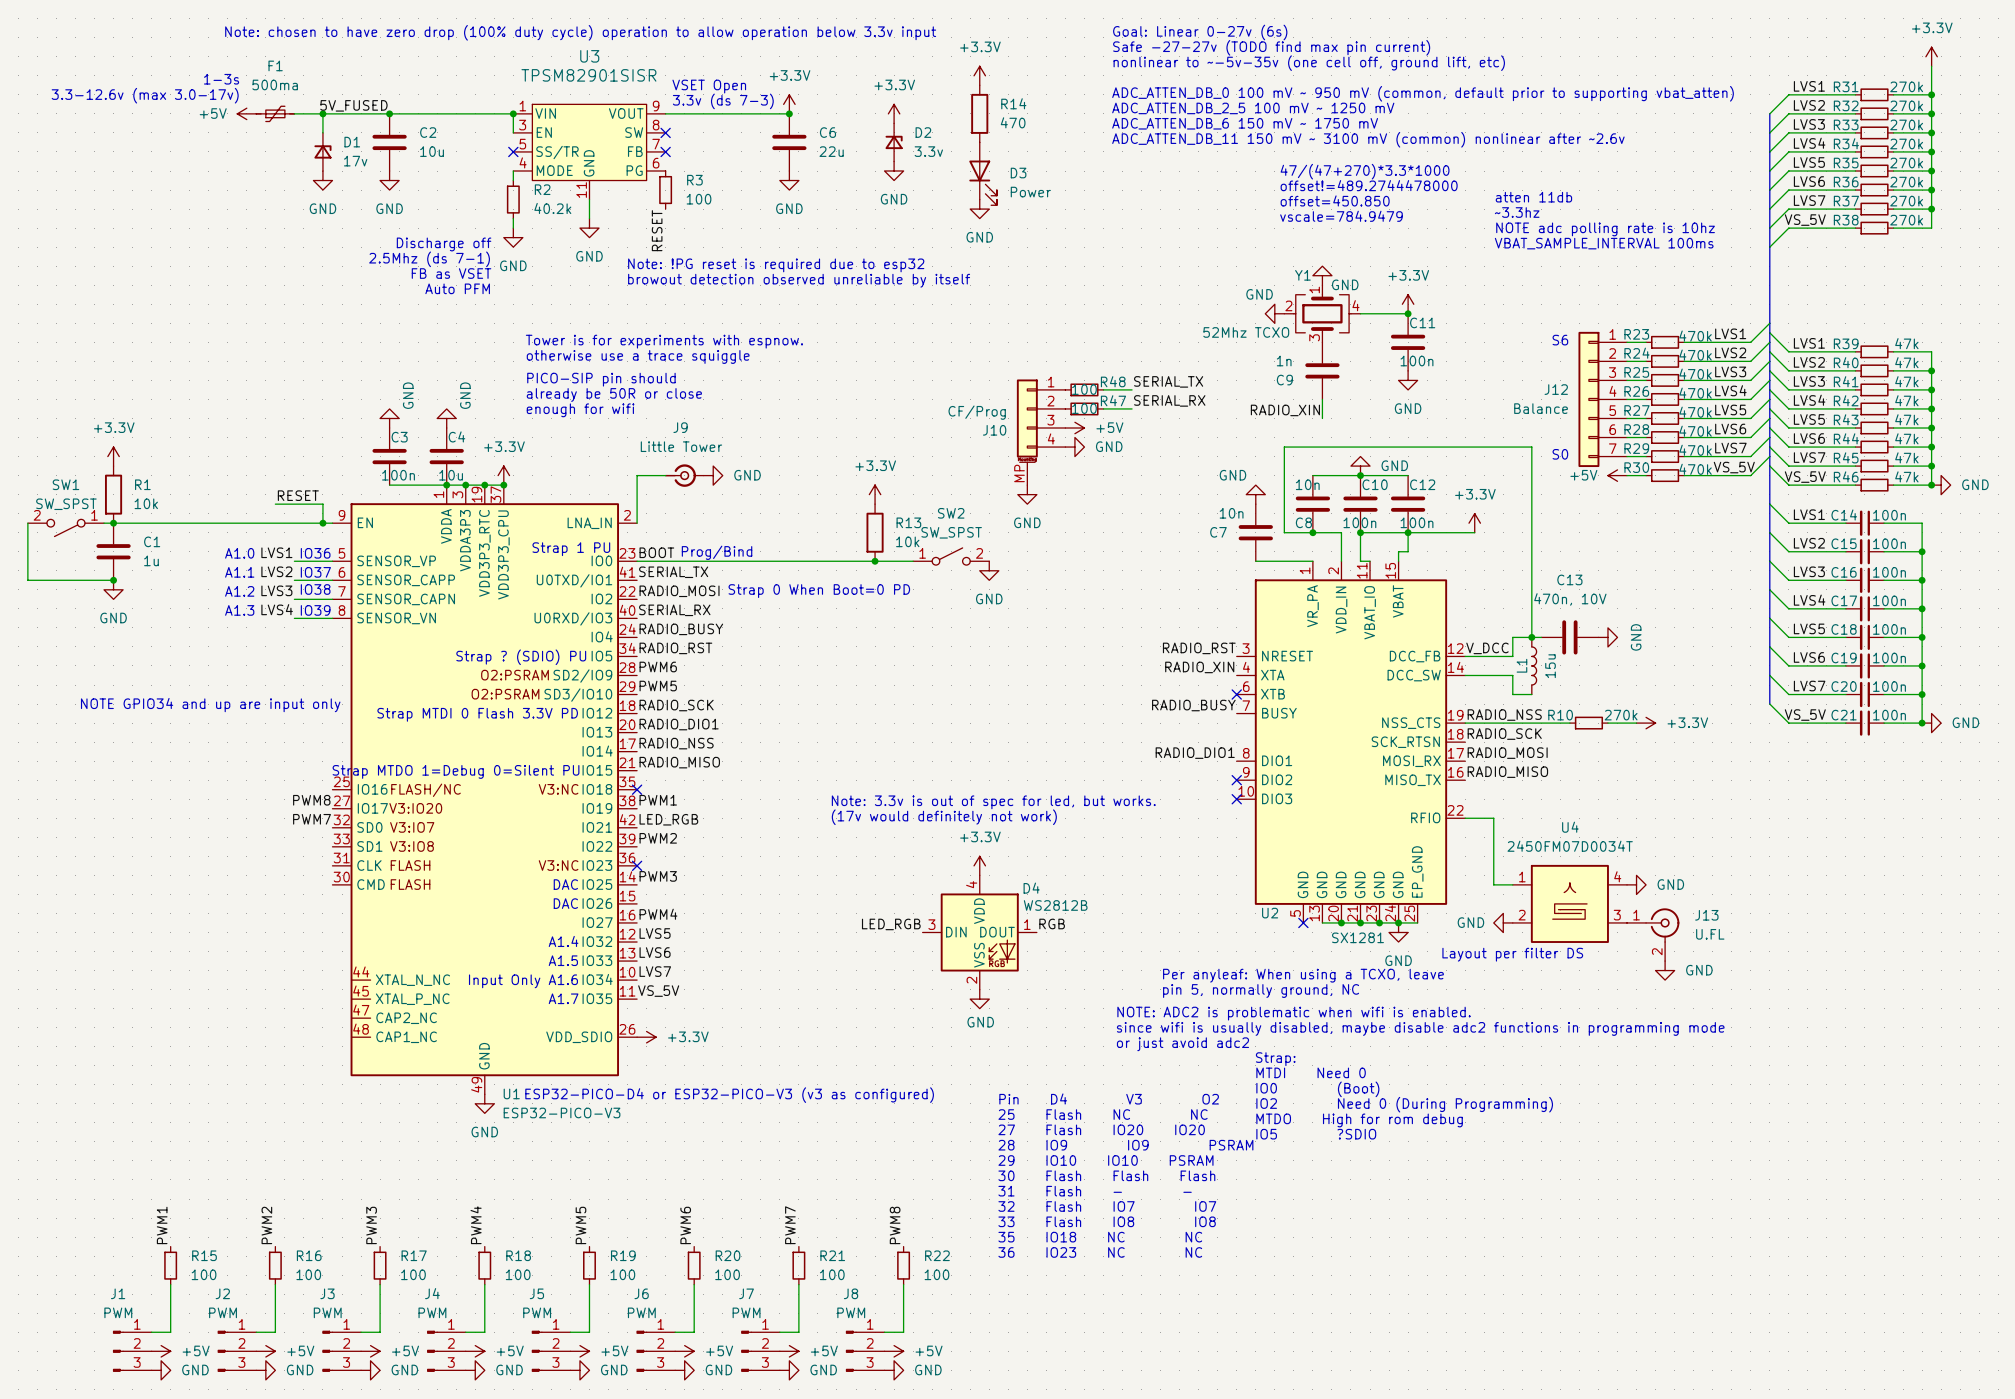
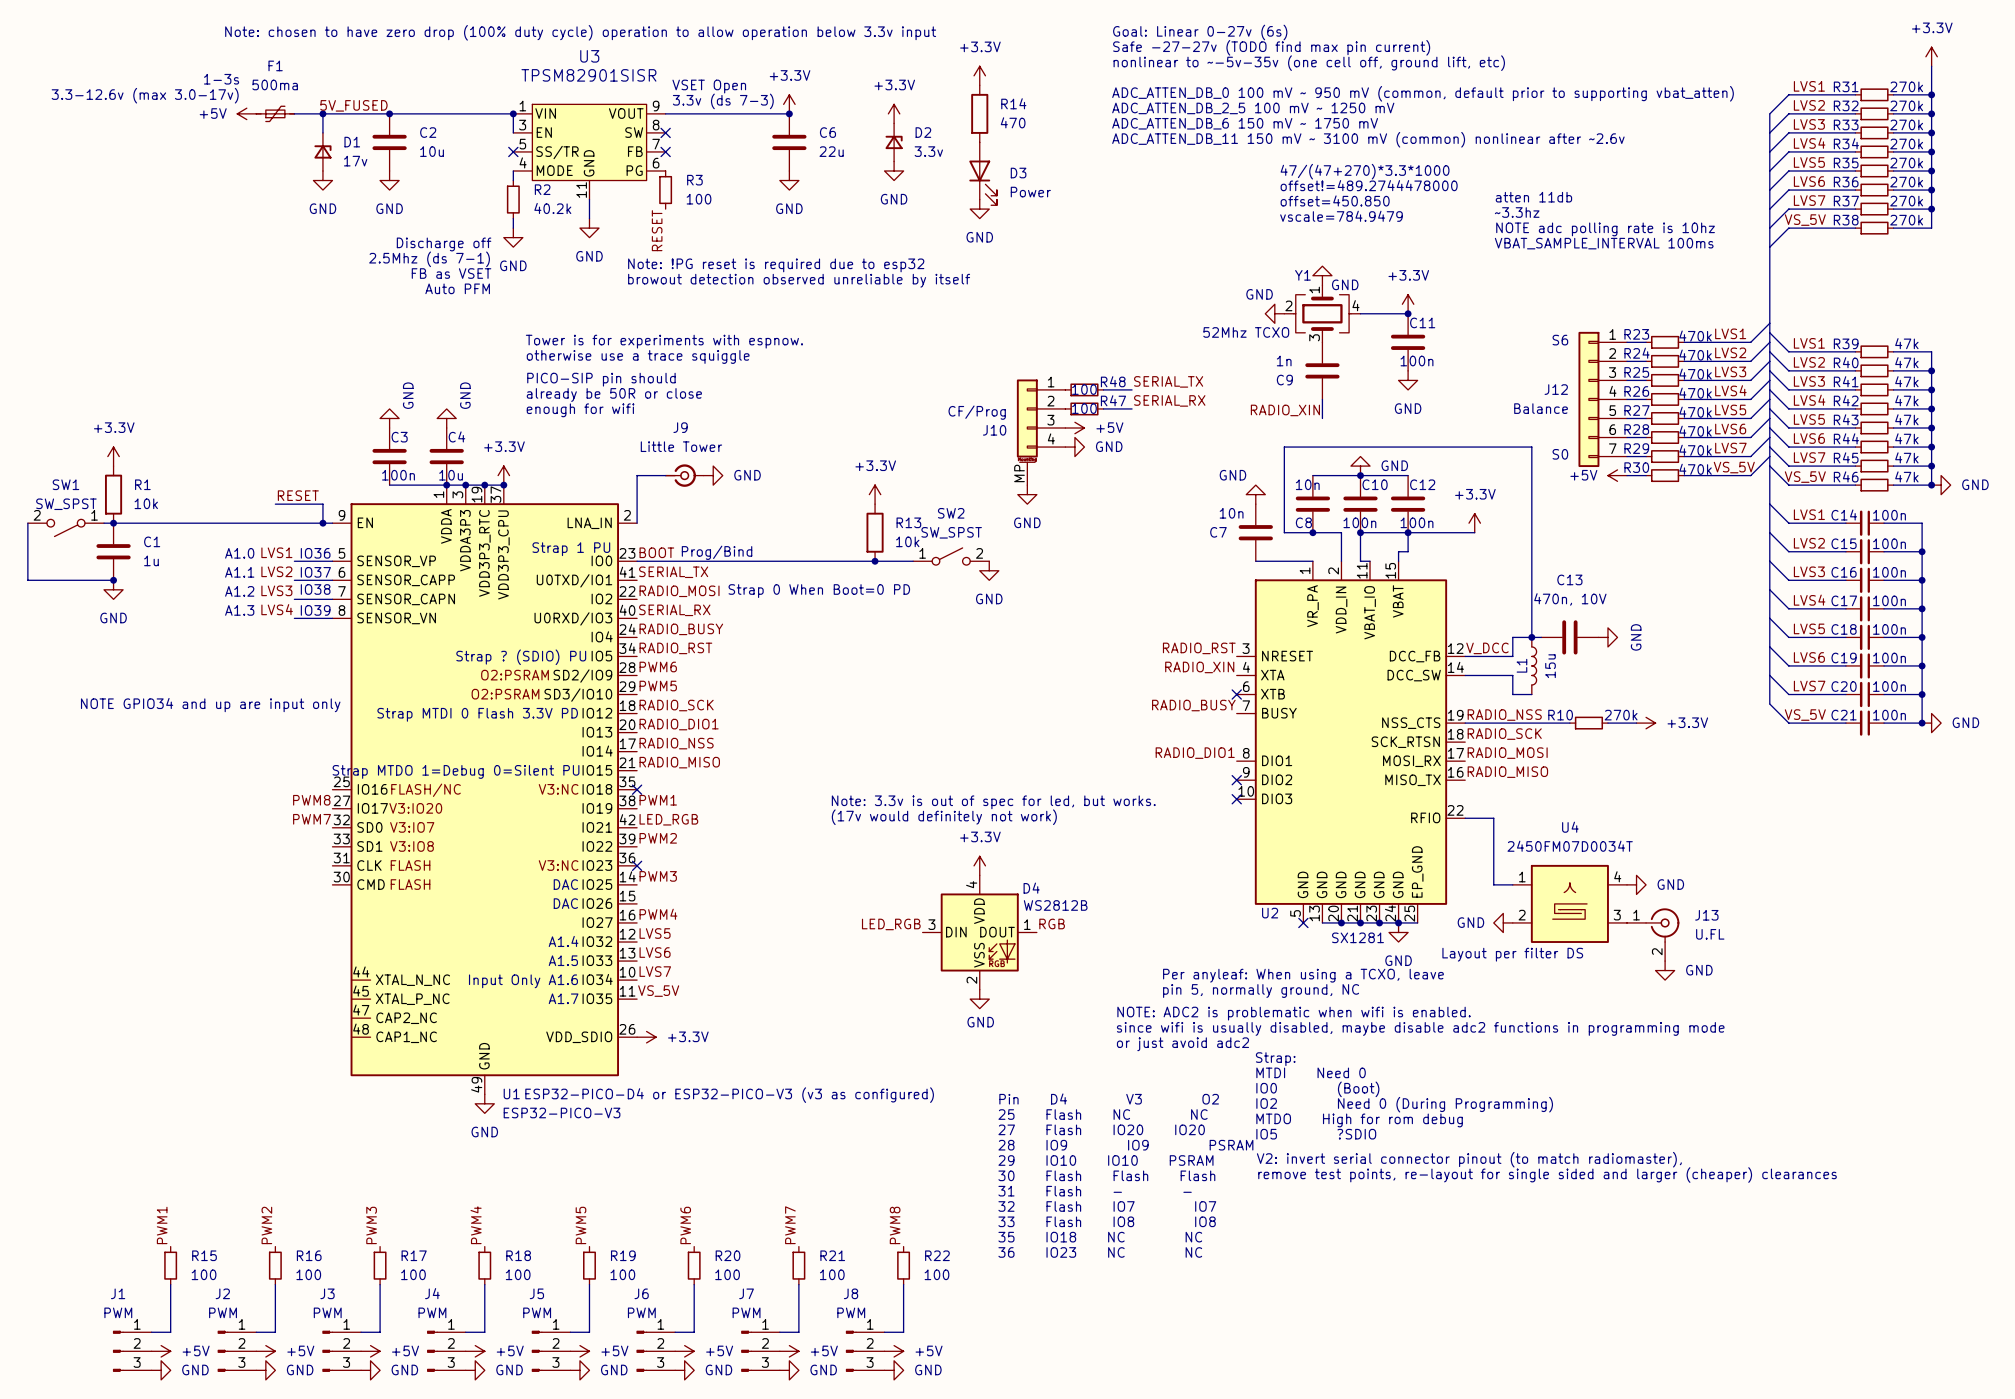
text: none -> V2: invert serial connector pinout (to match radiomaster), (1469, 1159)
text: none -> remove test points, re-layout for single sided and larger (cheaper) clearances (1547, 1175)

